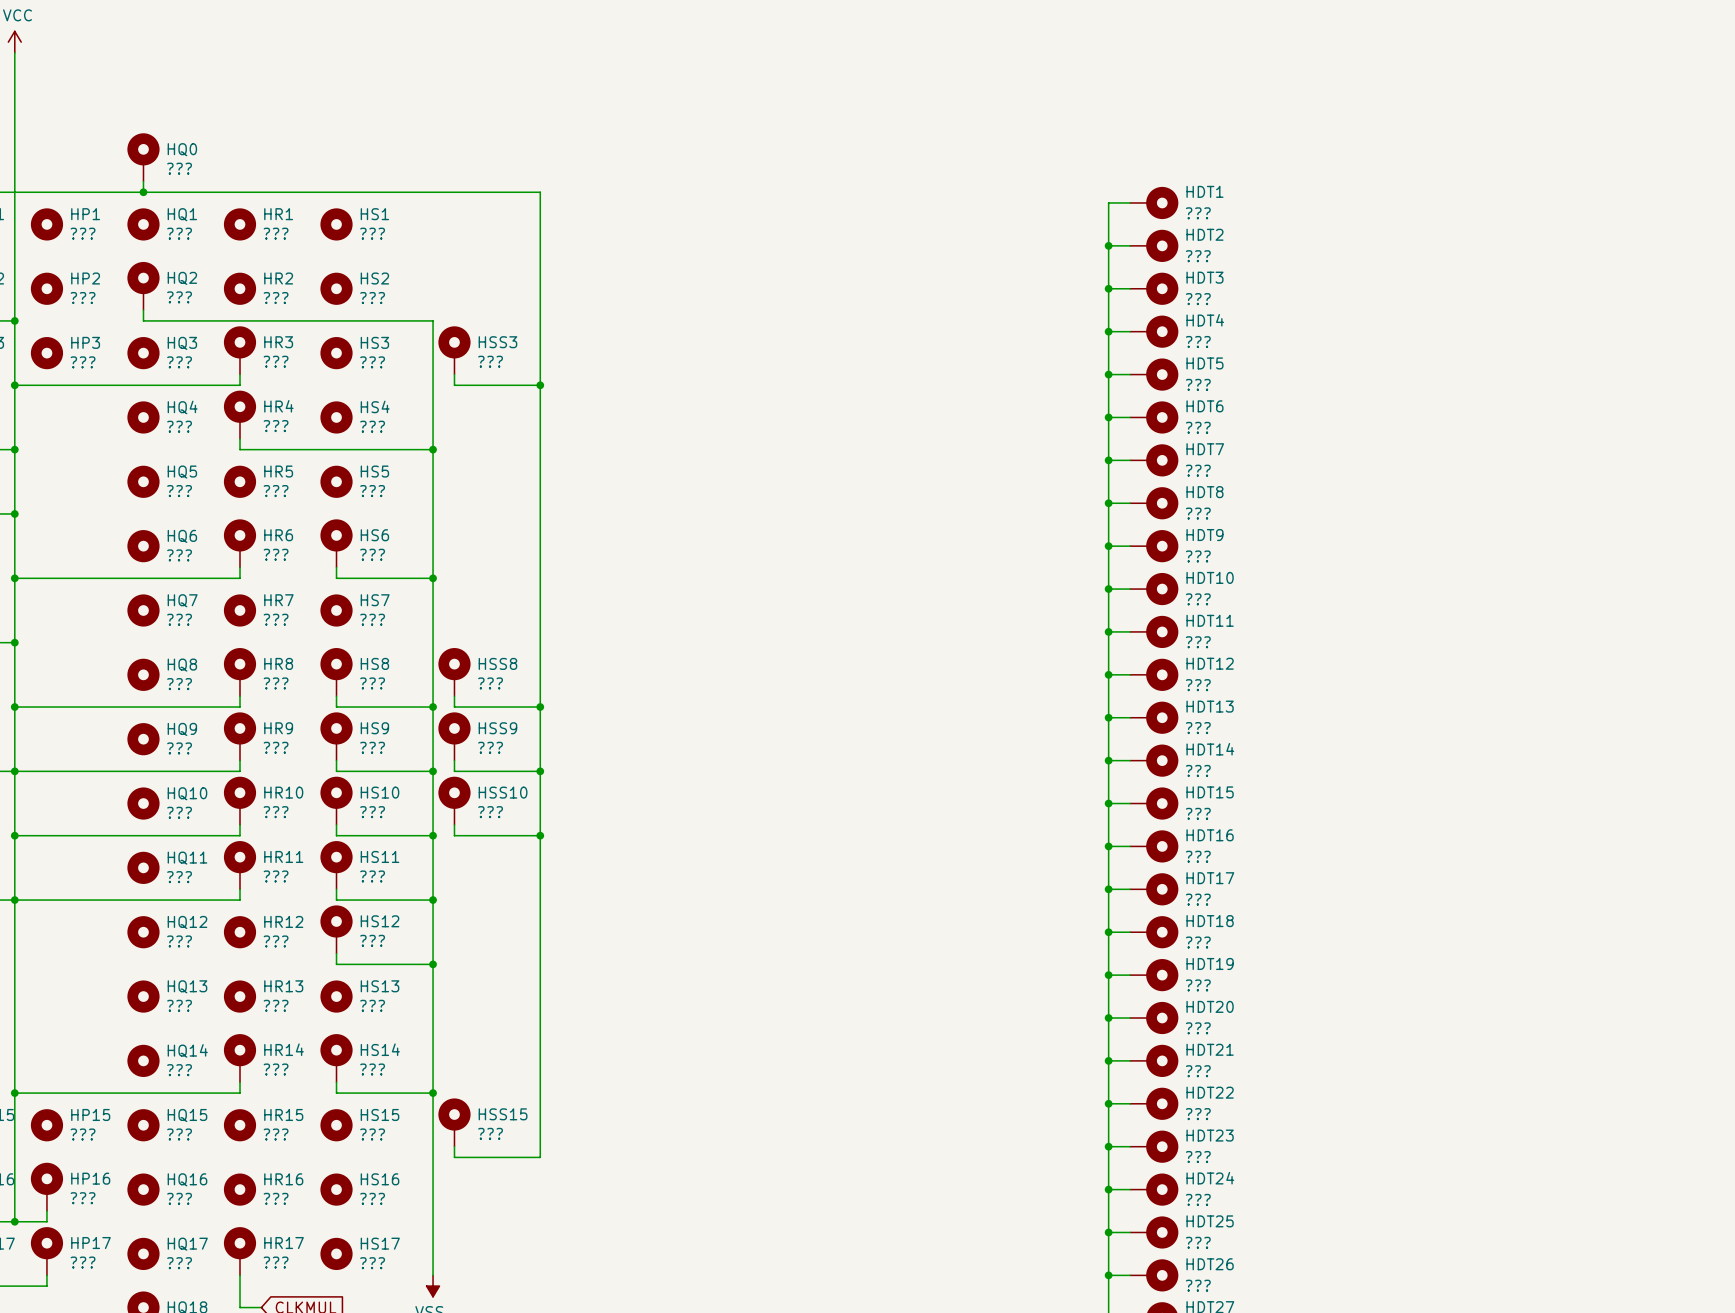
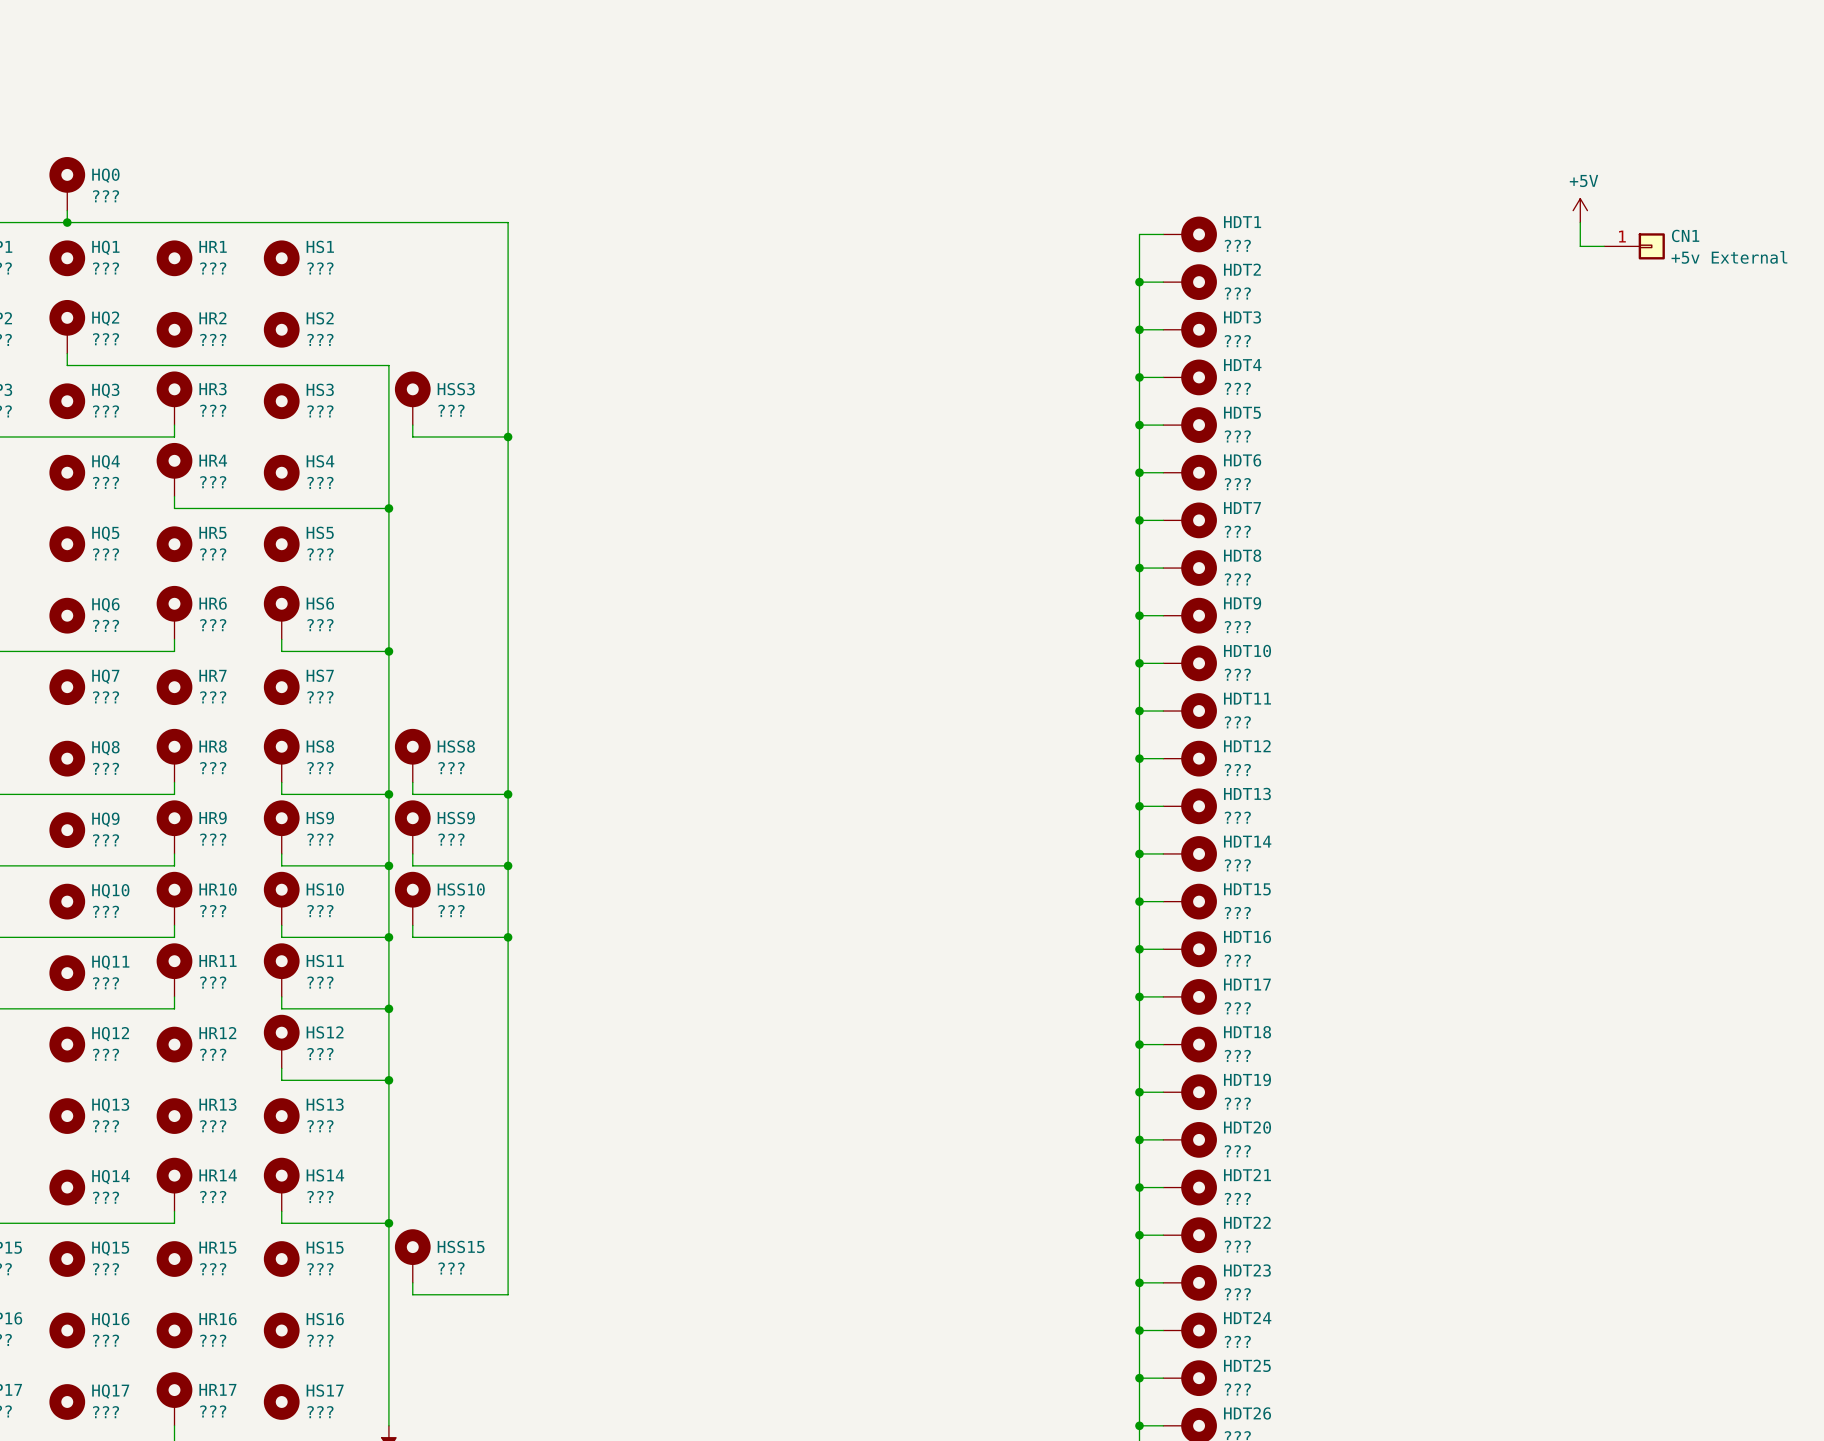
power symbol: none -> +5V (1580, 210)
wire: none -> (1580, 222) (1580, 246) (1604, 246)
CN1: none -> +5v External (1634, 246)

